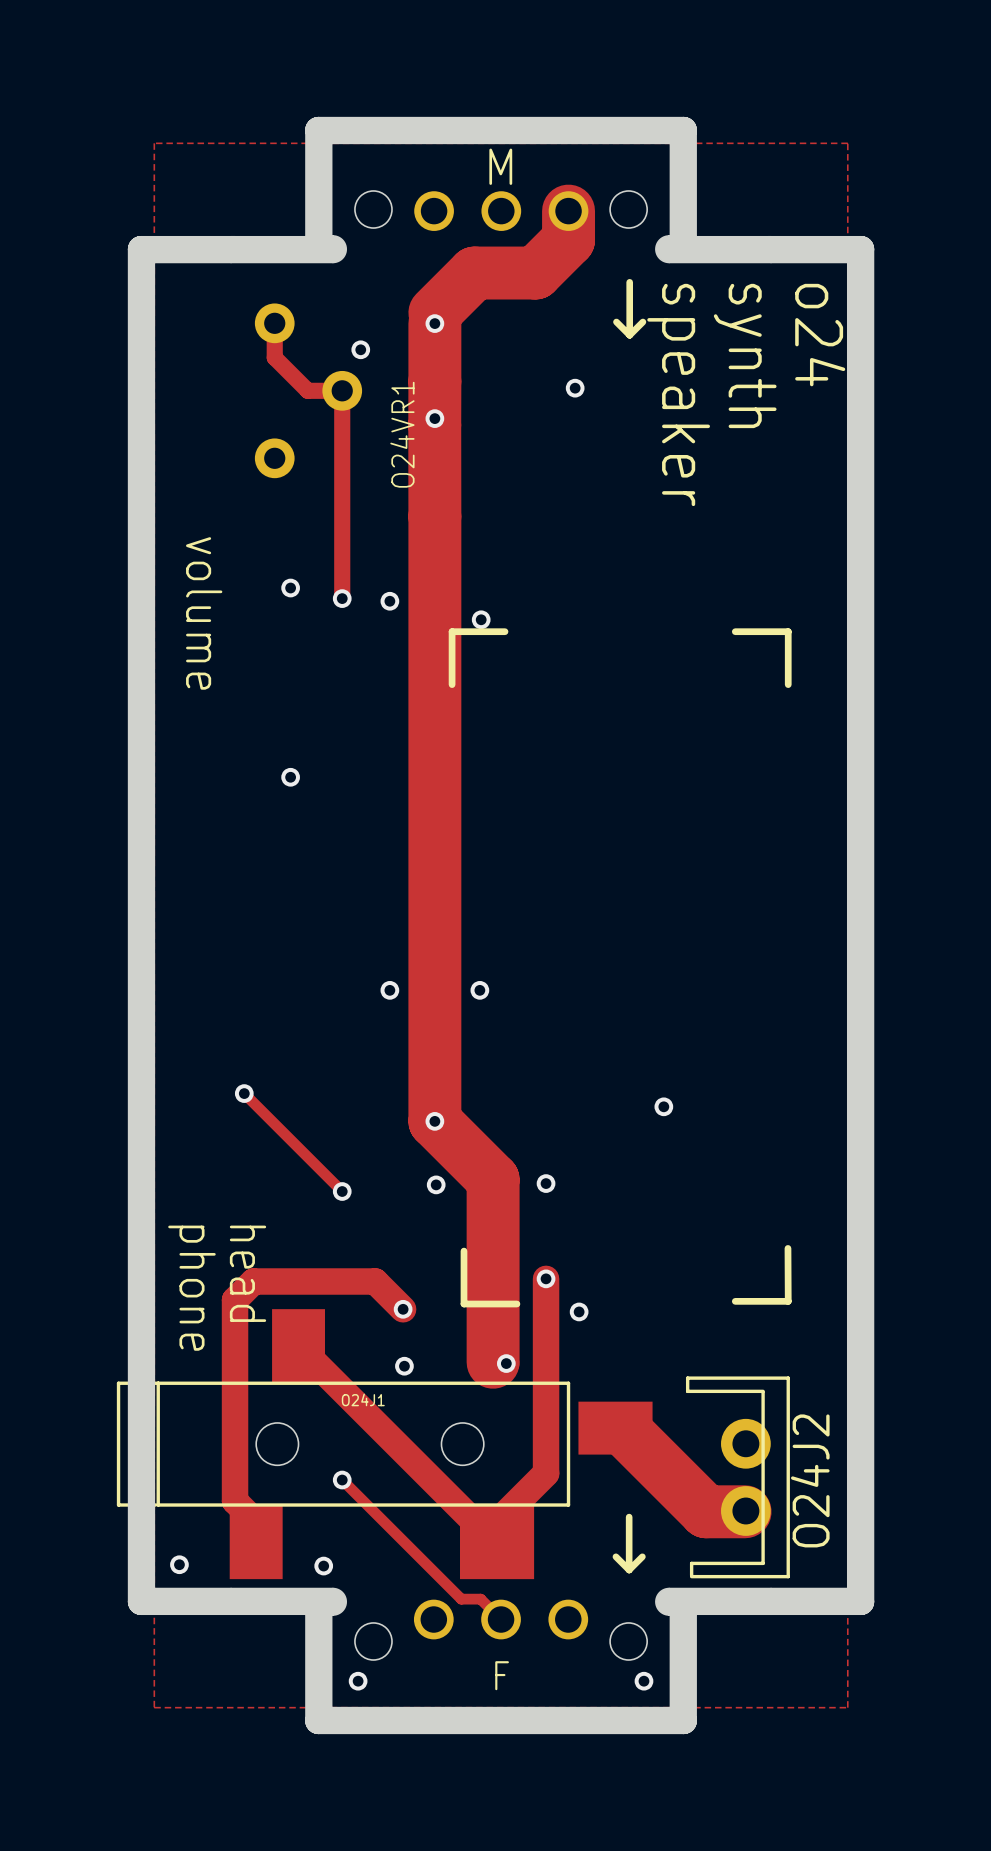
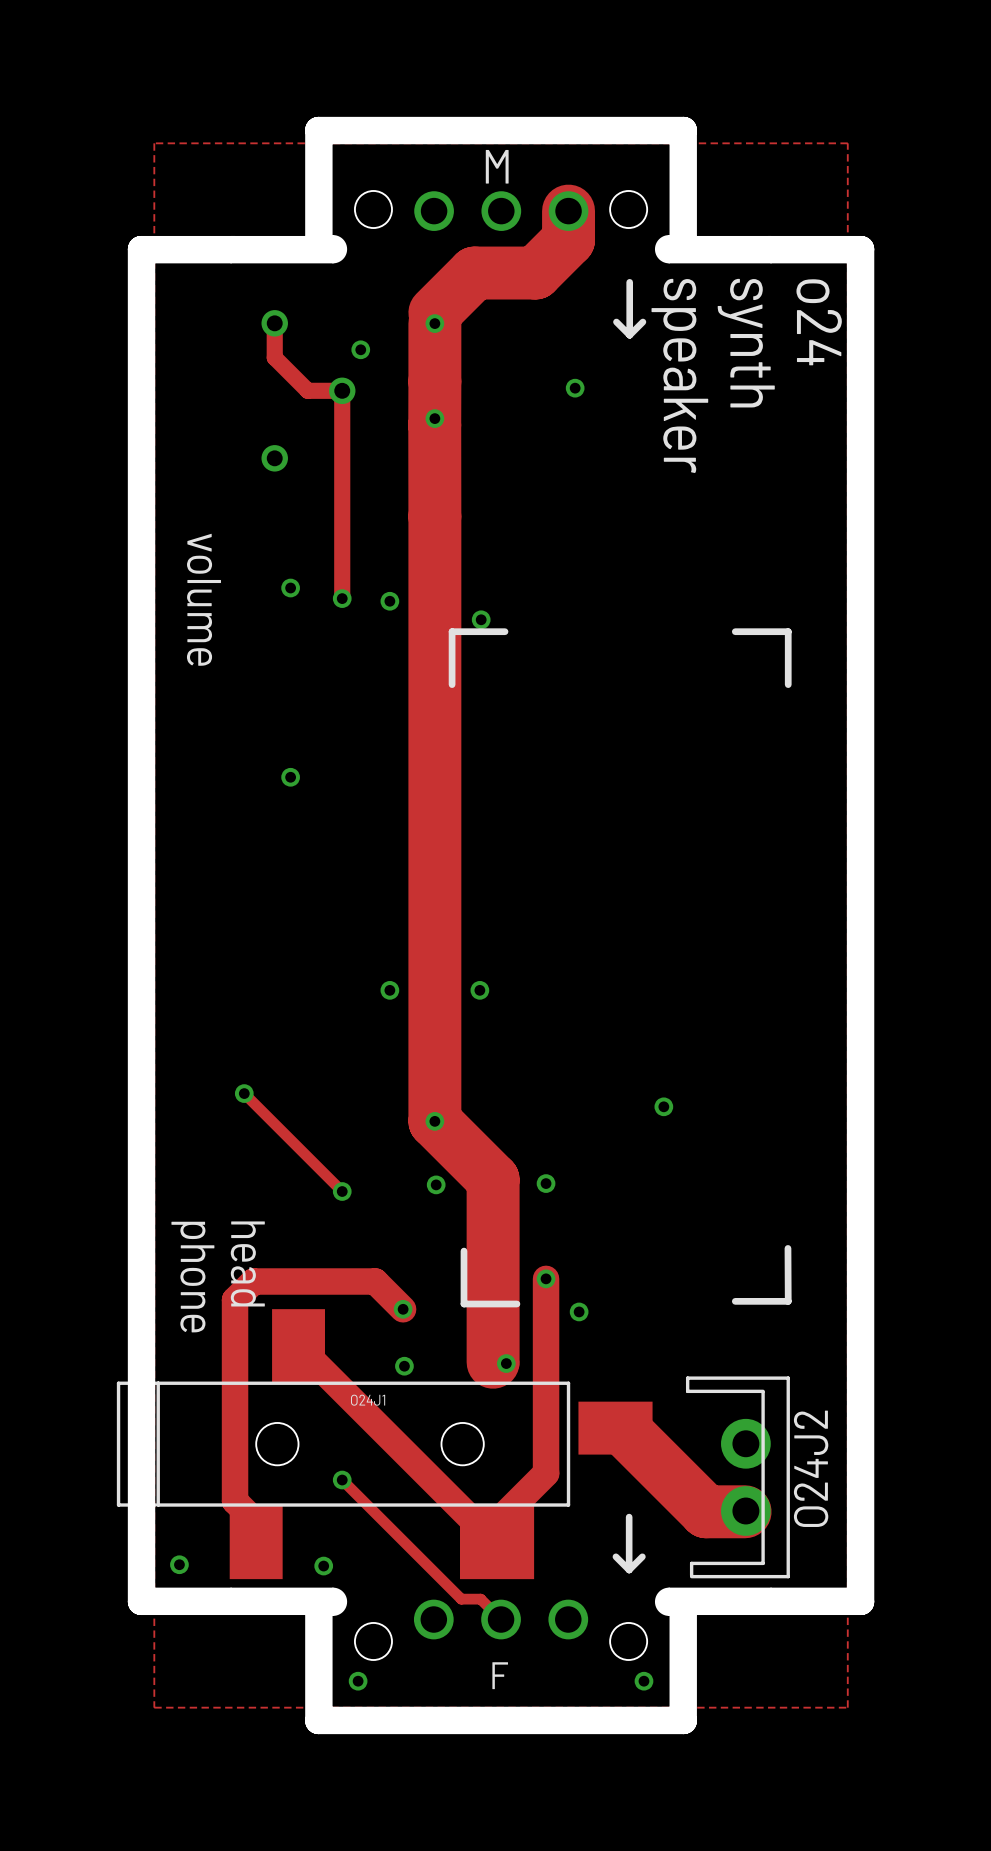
O24VR1: (308, 390) -> none
part: none -> (308, 390)

